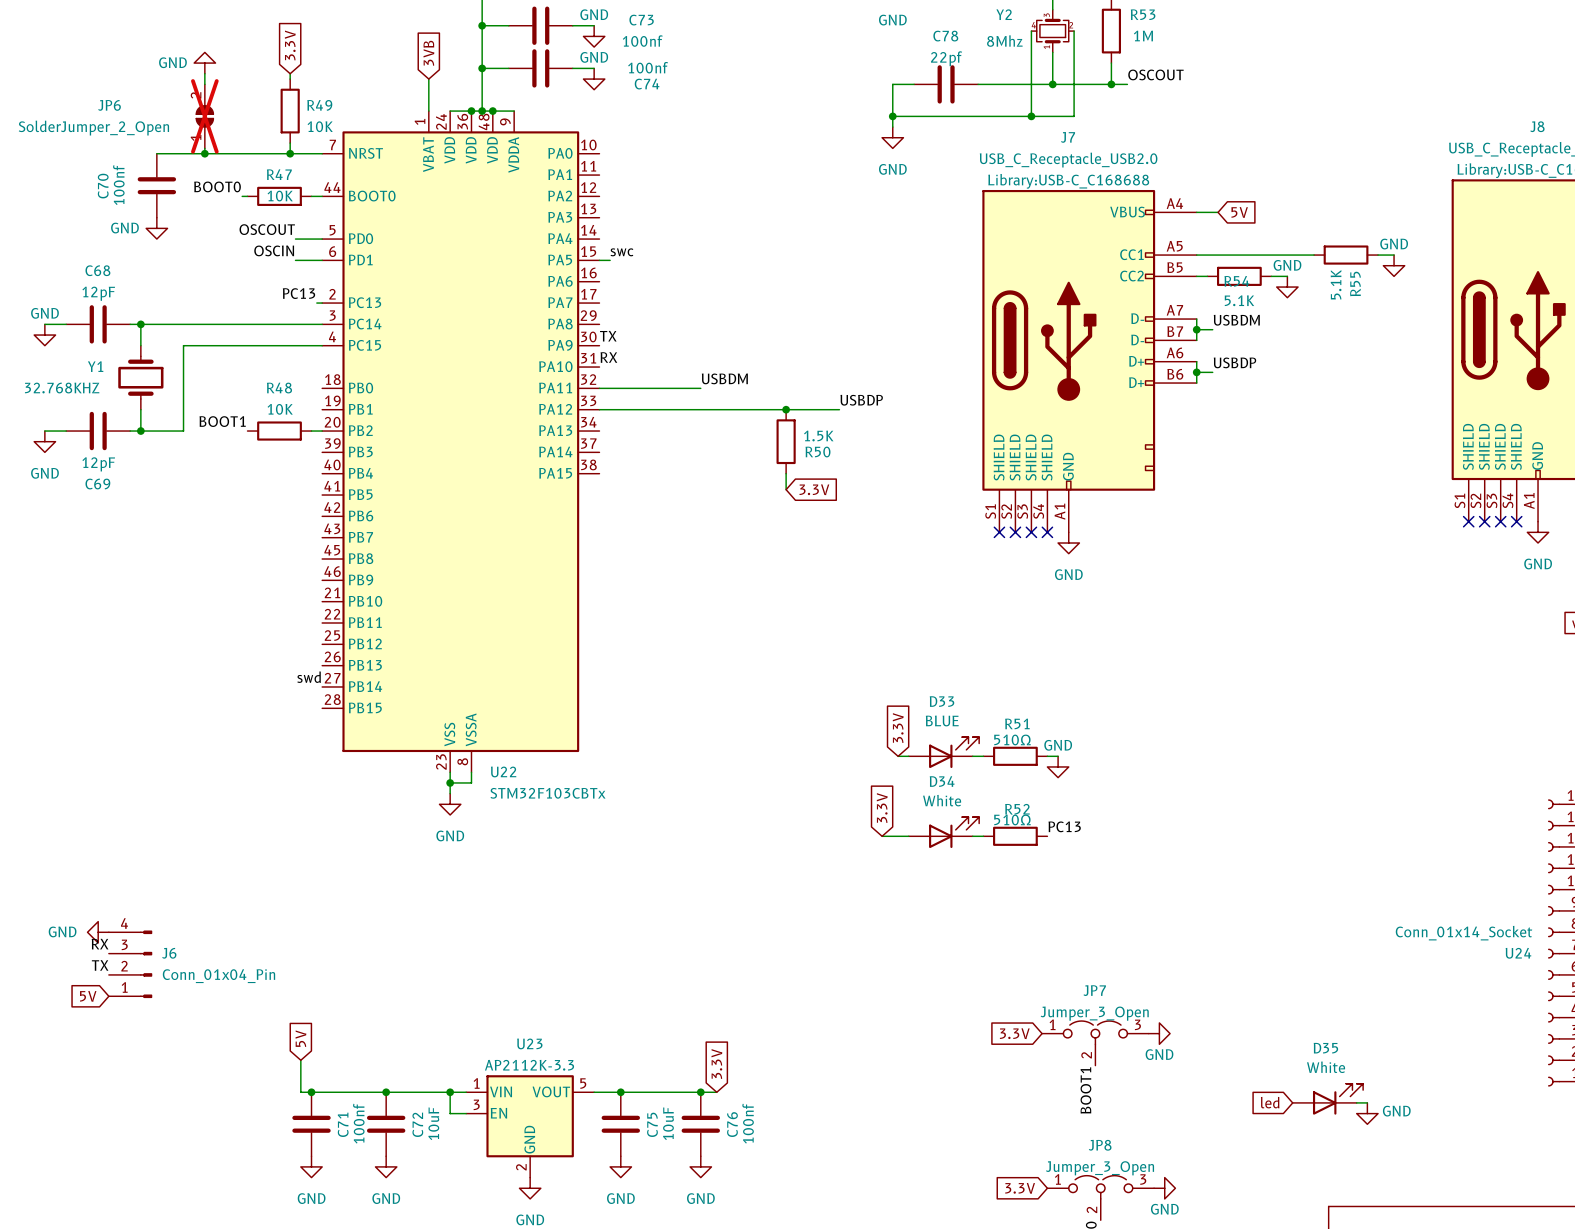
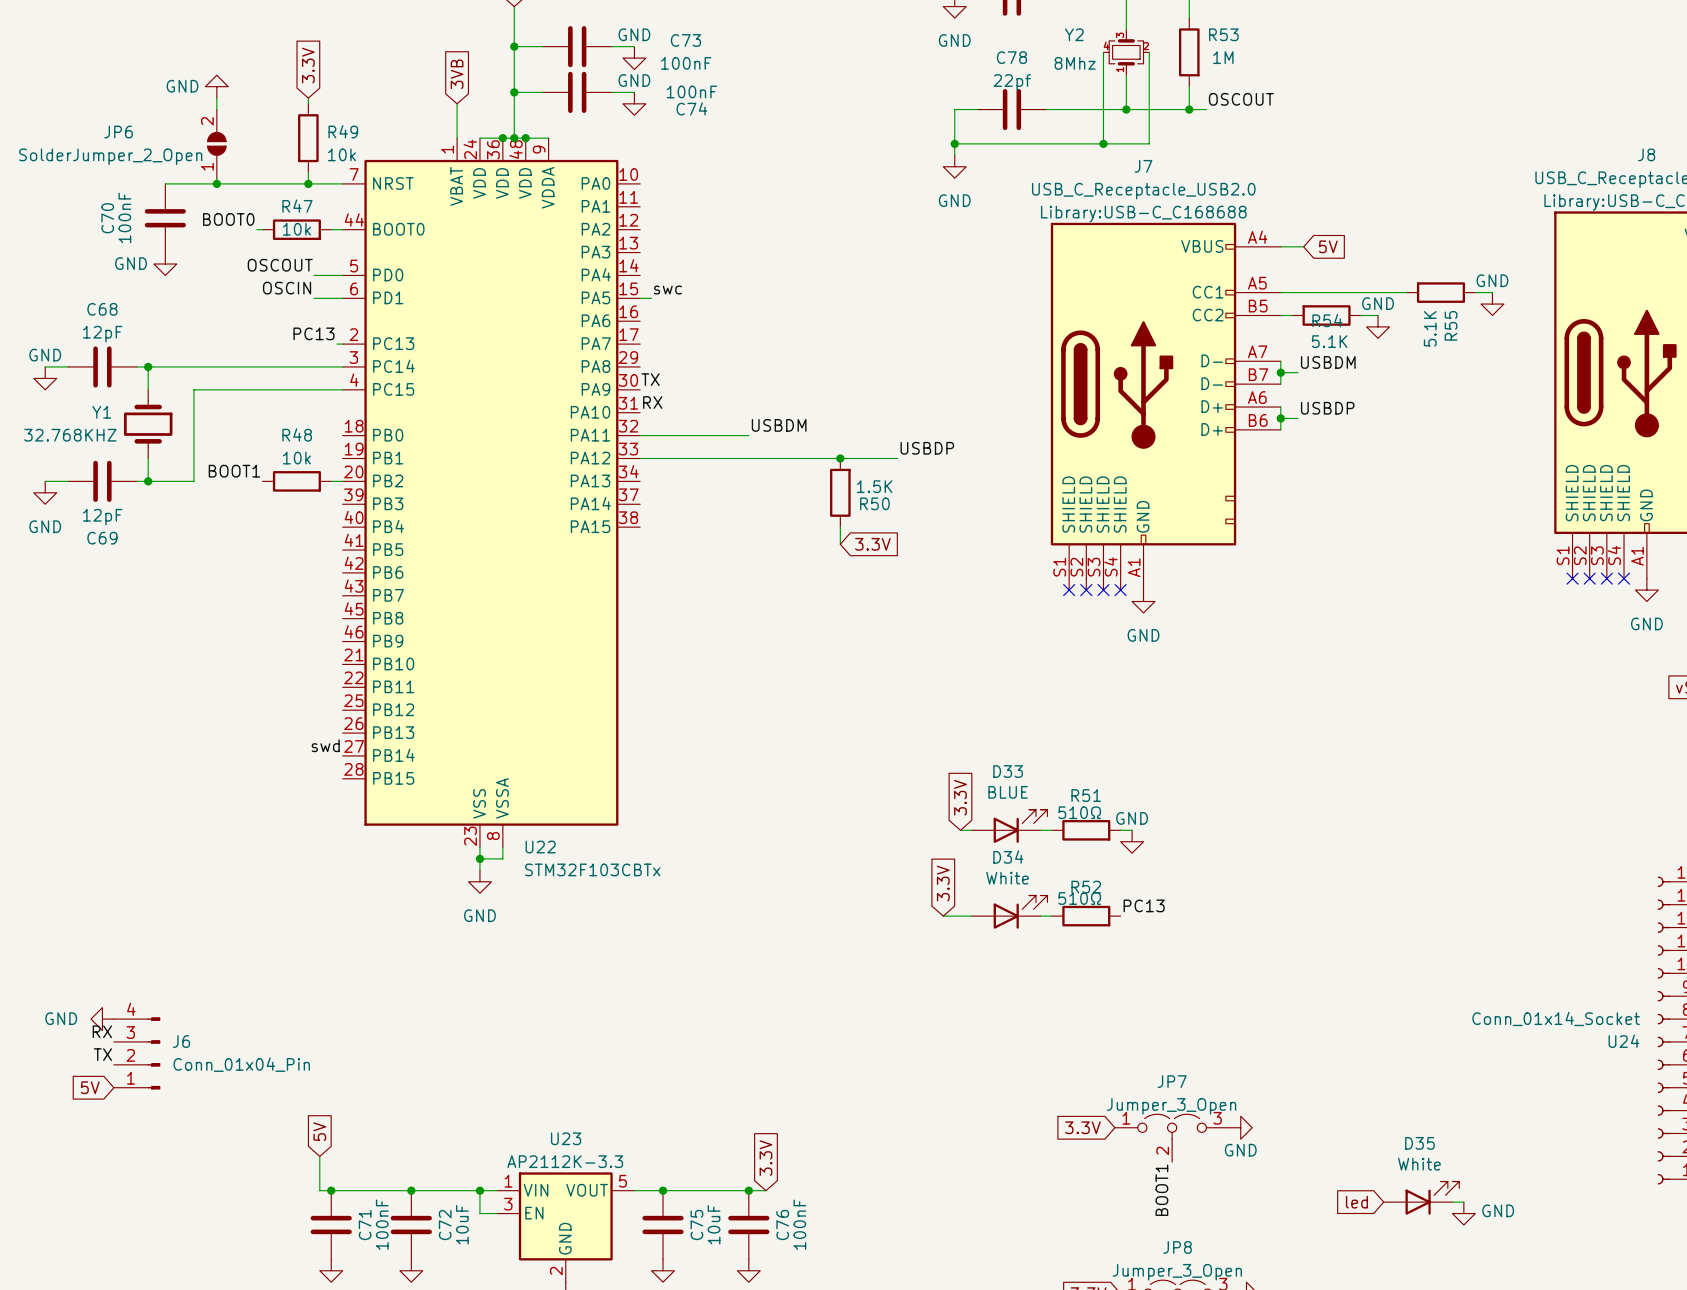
C73 value: 100nf (642, 41) -> 100nF (686, 63)
C74 value: 100nf (648, 67) -> 100nF (691, 91)
JP6 do-not-place cross: (204, 116) -> none
R49 value: 10K (320, 126) -> 10k (341, 154)
C70 value: 100nf (118, 185) -> 100nF (124, 217)
R47 value: 10K (280, 196) -> 10k (296, 229)
R48 value: 10K (280, 409) -> 10k (296, 458)
C71 value: 100nf (358, 1123) -> 100nF (382, 1224)
C76 value: 100nf (748, 1123) -> 100nF (799, 1224)

